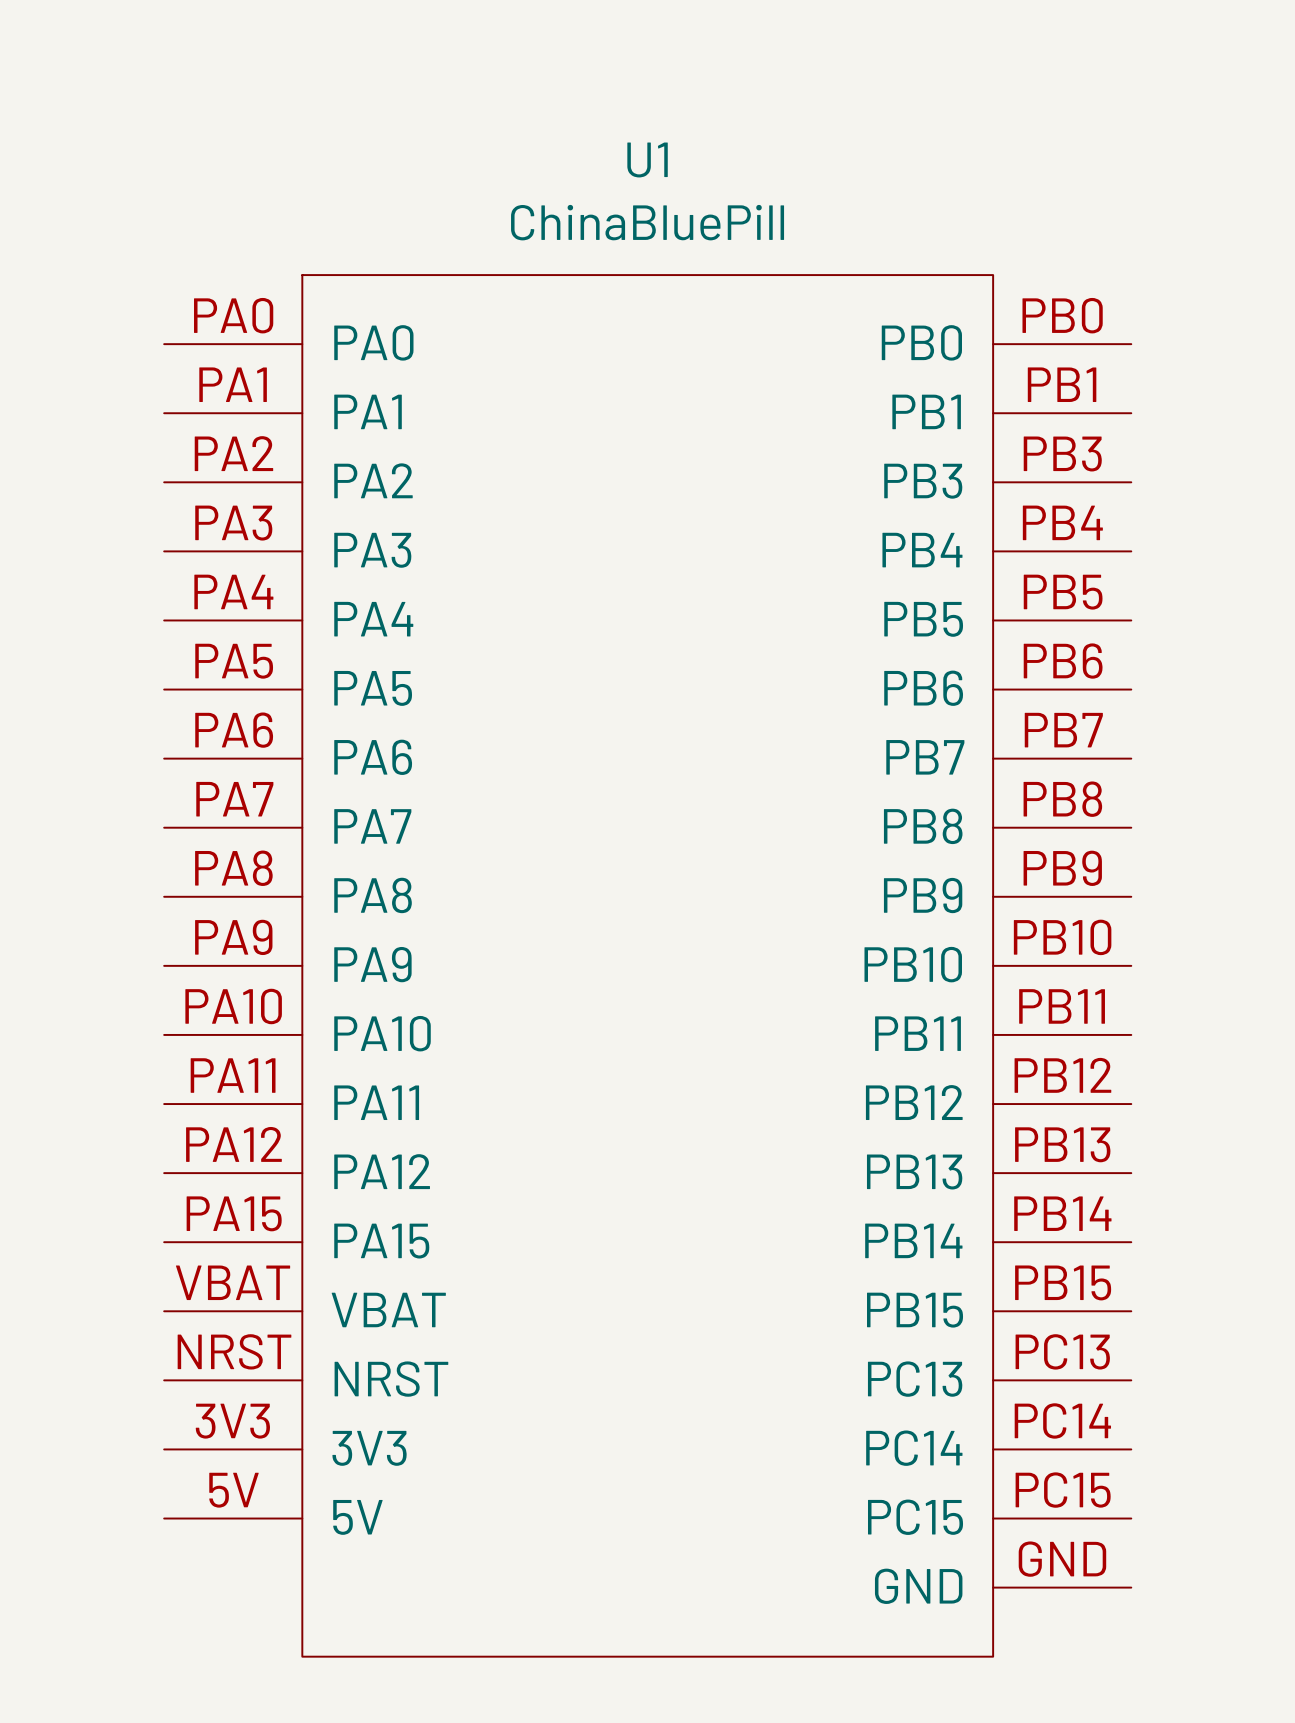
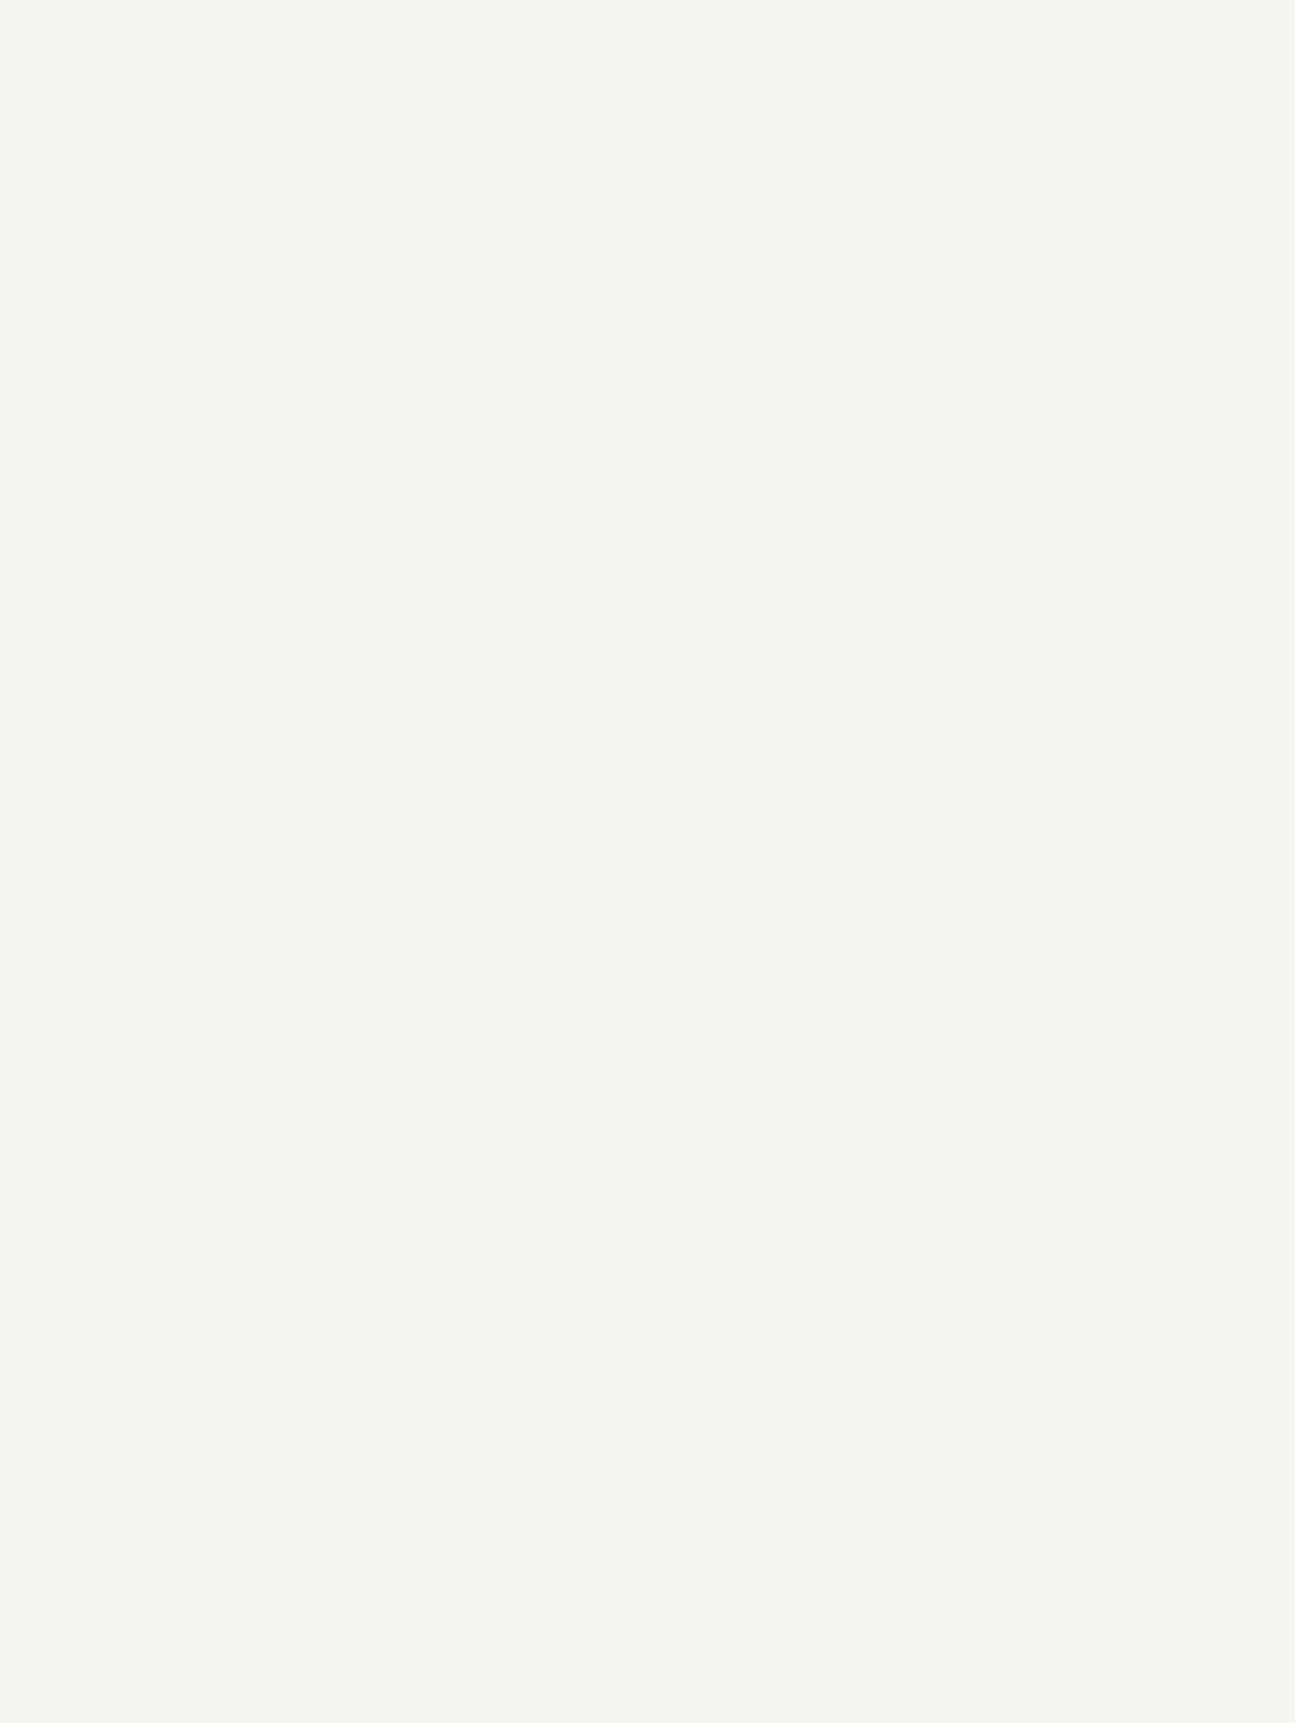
U1: ChinaBluePill (647, 965) -> none

